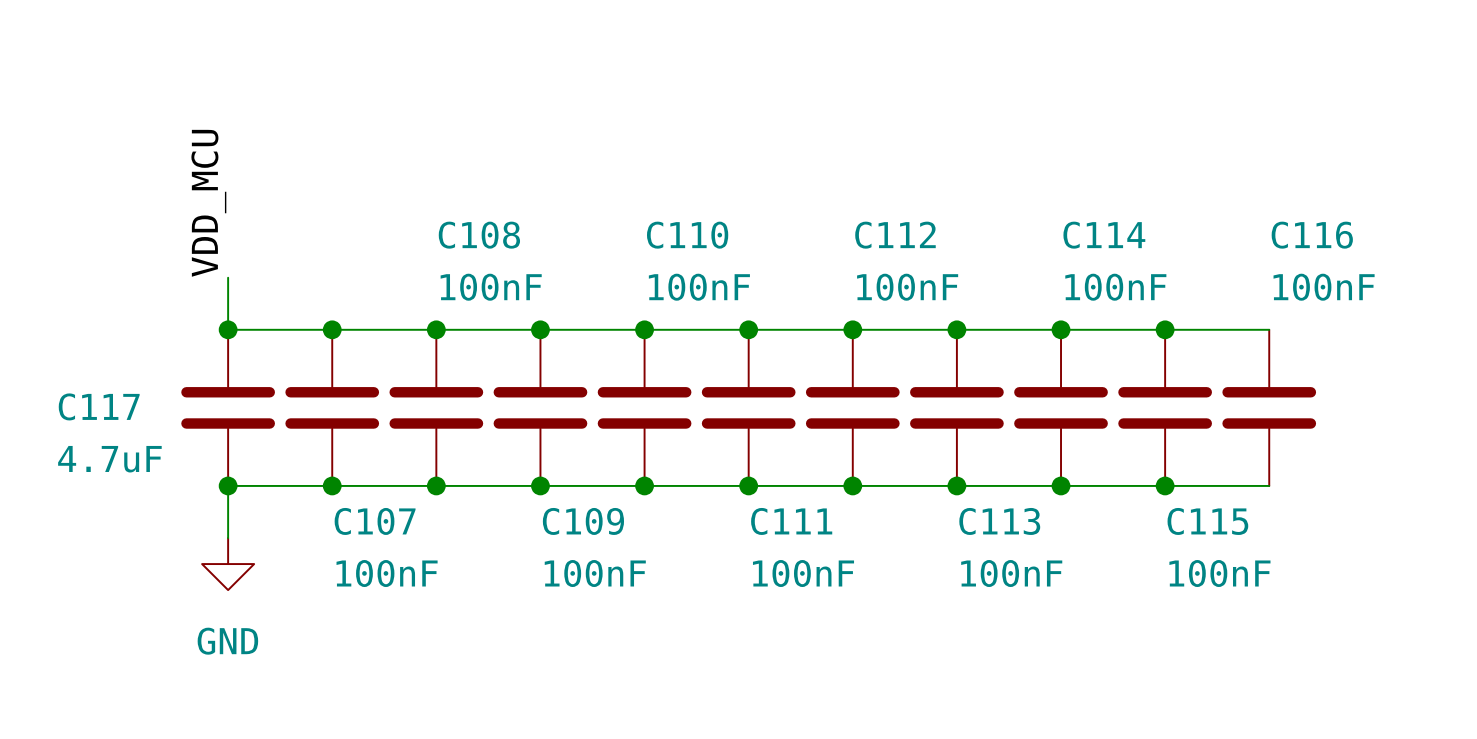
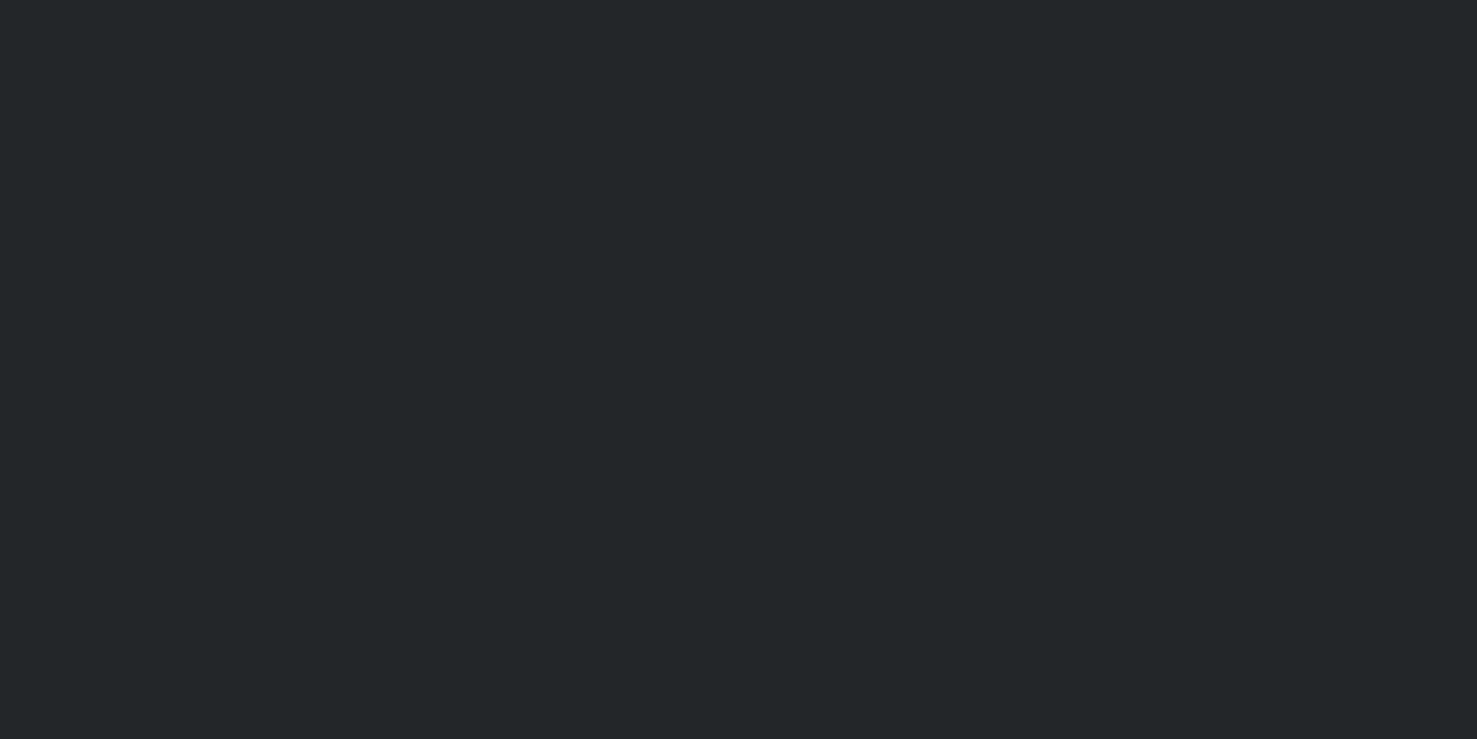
label: VDD_MCU (208, 203) -> none
wire: (228, 277) (228, 329) (1269, 329) -> none
junction: (228, 329) -> none
junction: (332, 329) -> none
junction: (436, 329) -> none
junction: (540, 329) -> none
junction: (644, 329) -> none
junction: (748, 329) -> none
junction: (852, 329) -> none
junction: (956, 329) -> none
junction: (1061, 329) -> none
junction: (1165, 329) -> none
C117: 4.7uF (228, 407) -> none
C107: 100nF (332, 407) -> none
C108: 100nF (436, 407) -> none
C109: 100nF (540, 407) -> none
C110: 100nF (644, 407) -> none
C111: 100nF (748, 407) -> none
C112: 100nF (852, 407) -> none
C113: 100nF (956, 407) -> none
C114: 100nF (1061, 407) -> none
C115: 100nF (1165, 407) -> none
C116: 100nF (1269, 407) -> none
junction: (228, 485) -> none
junction: (332, 485) -> none
junction: (436, 485) -> none
junction: (540, 485) -> none
junction: (644, 485) -> none
junction: (748, 485) -> none
junction: (852, 485) -> none
junction: (956, 485) -> none
junction: (1061, 485) -> none
junction: (1165, 485) -> none
wire: (1269, 485) (228, 485) (228, 538) -> none
power symbol: GND (228, 564) -> none

